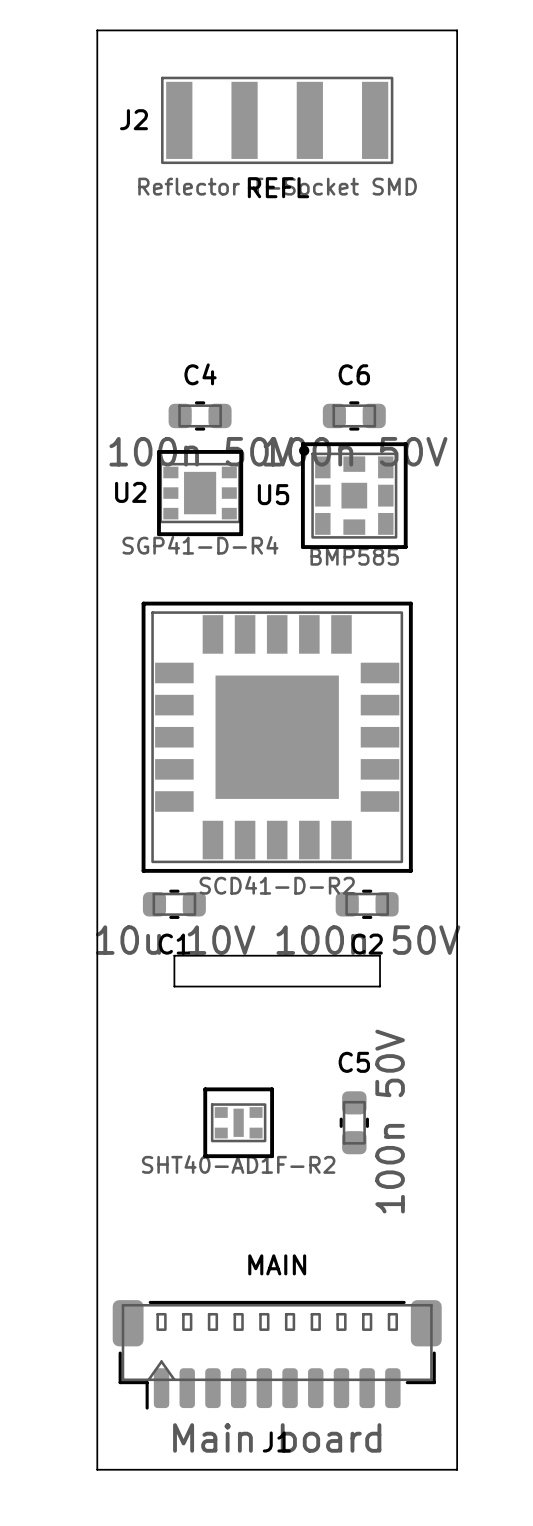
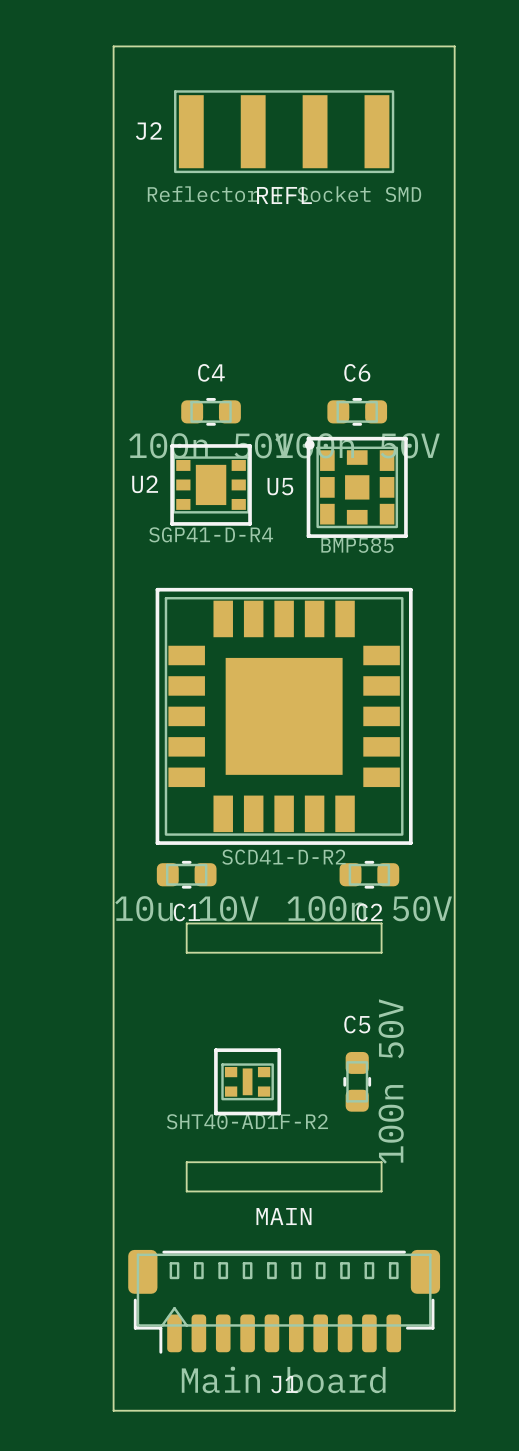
board edge: none -> (186, 1162) (186, 1191) (381, 1191) (381, 1162) (186, 1162)

